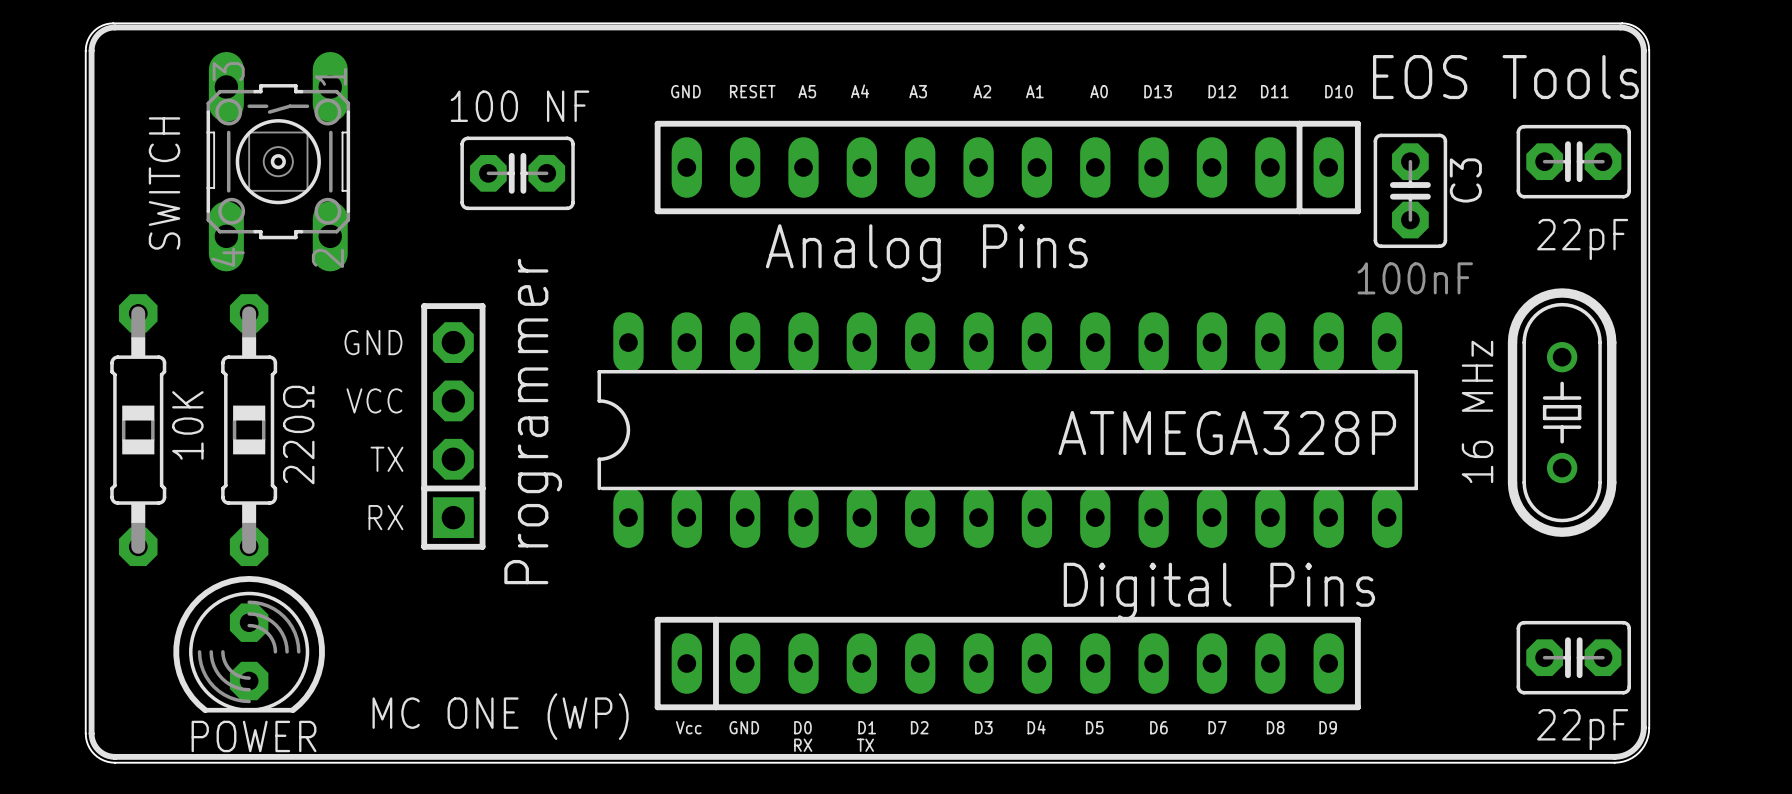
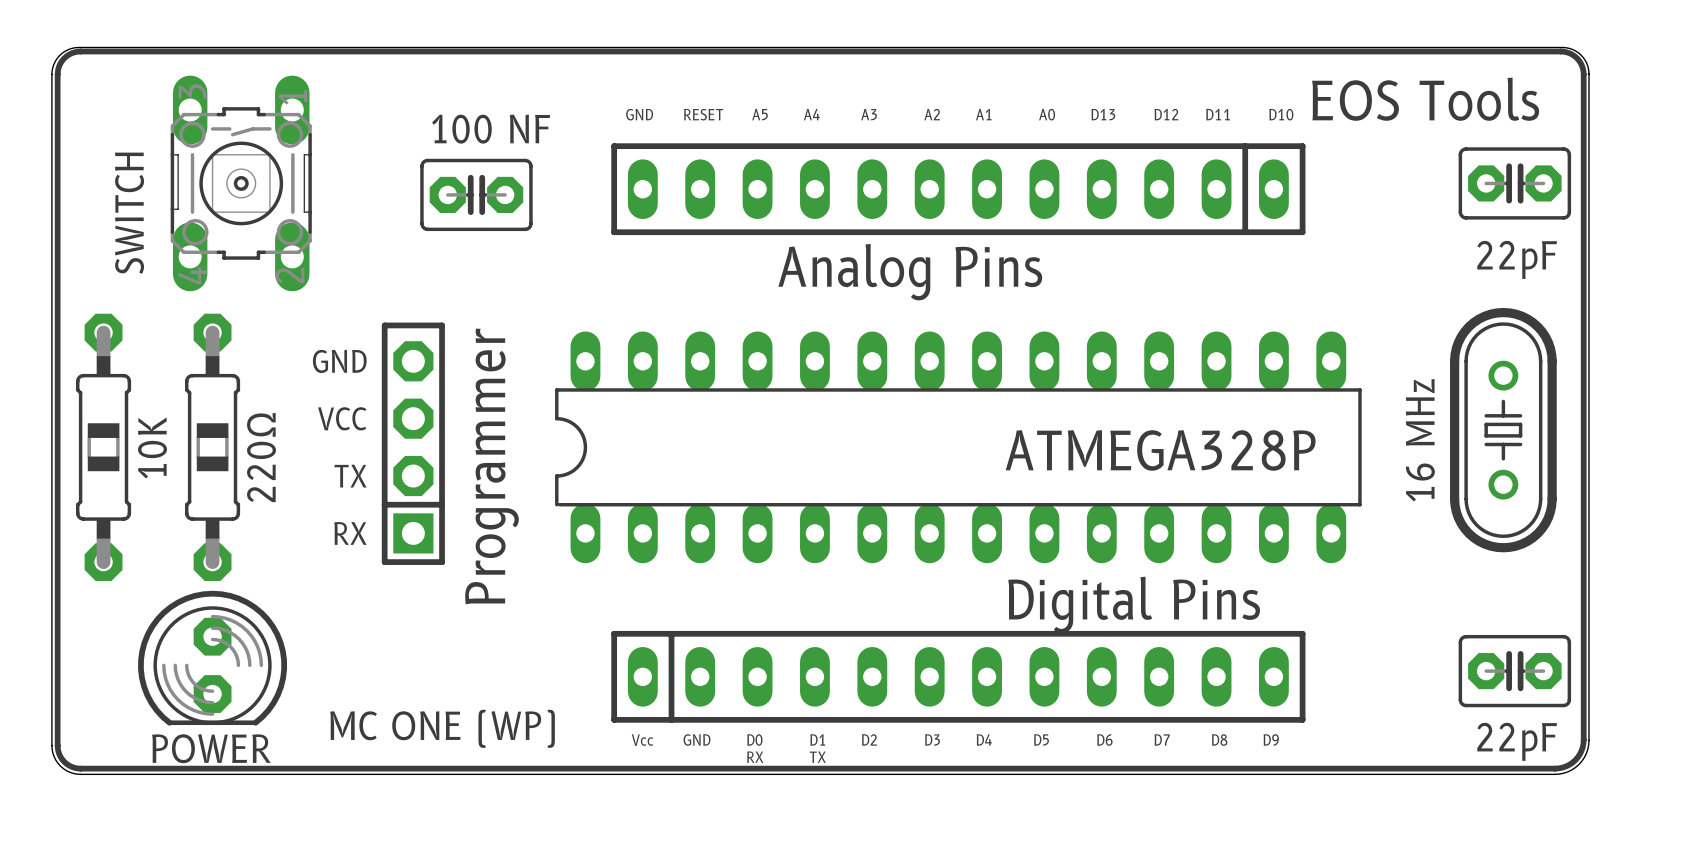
C3: 100nF (1410, 190) -> none

